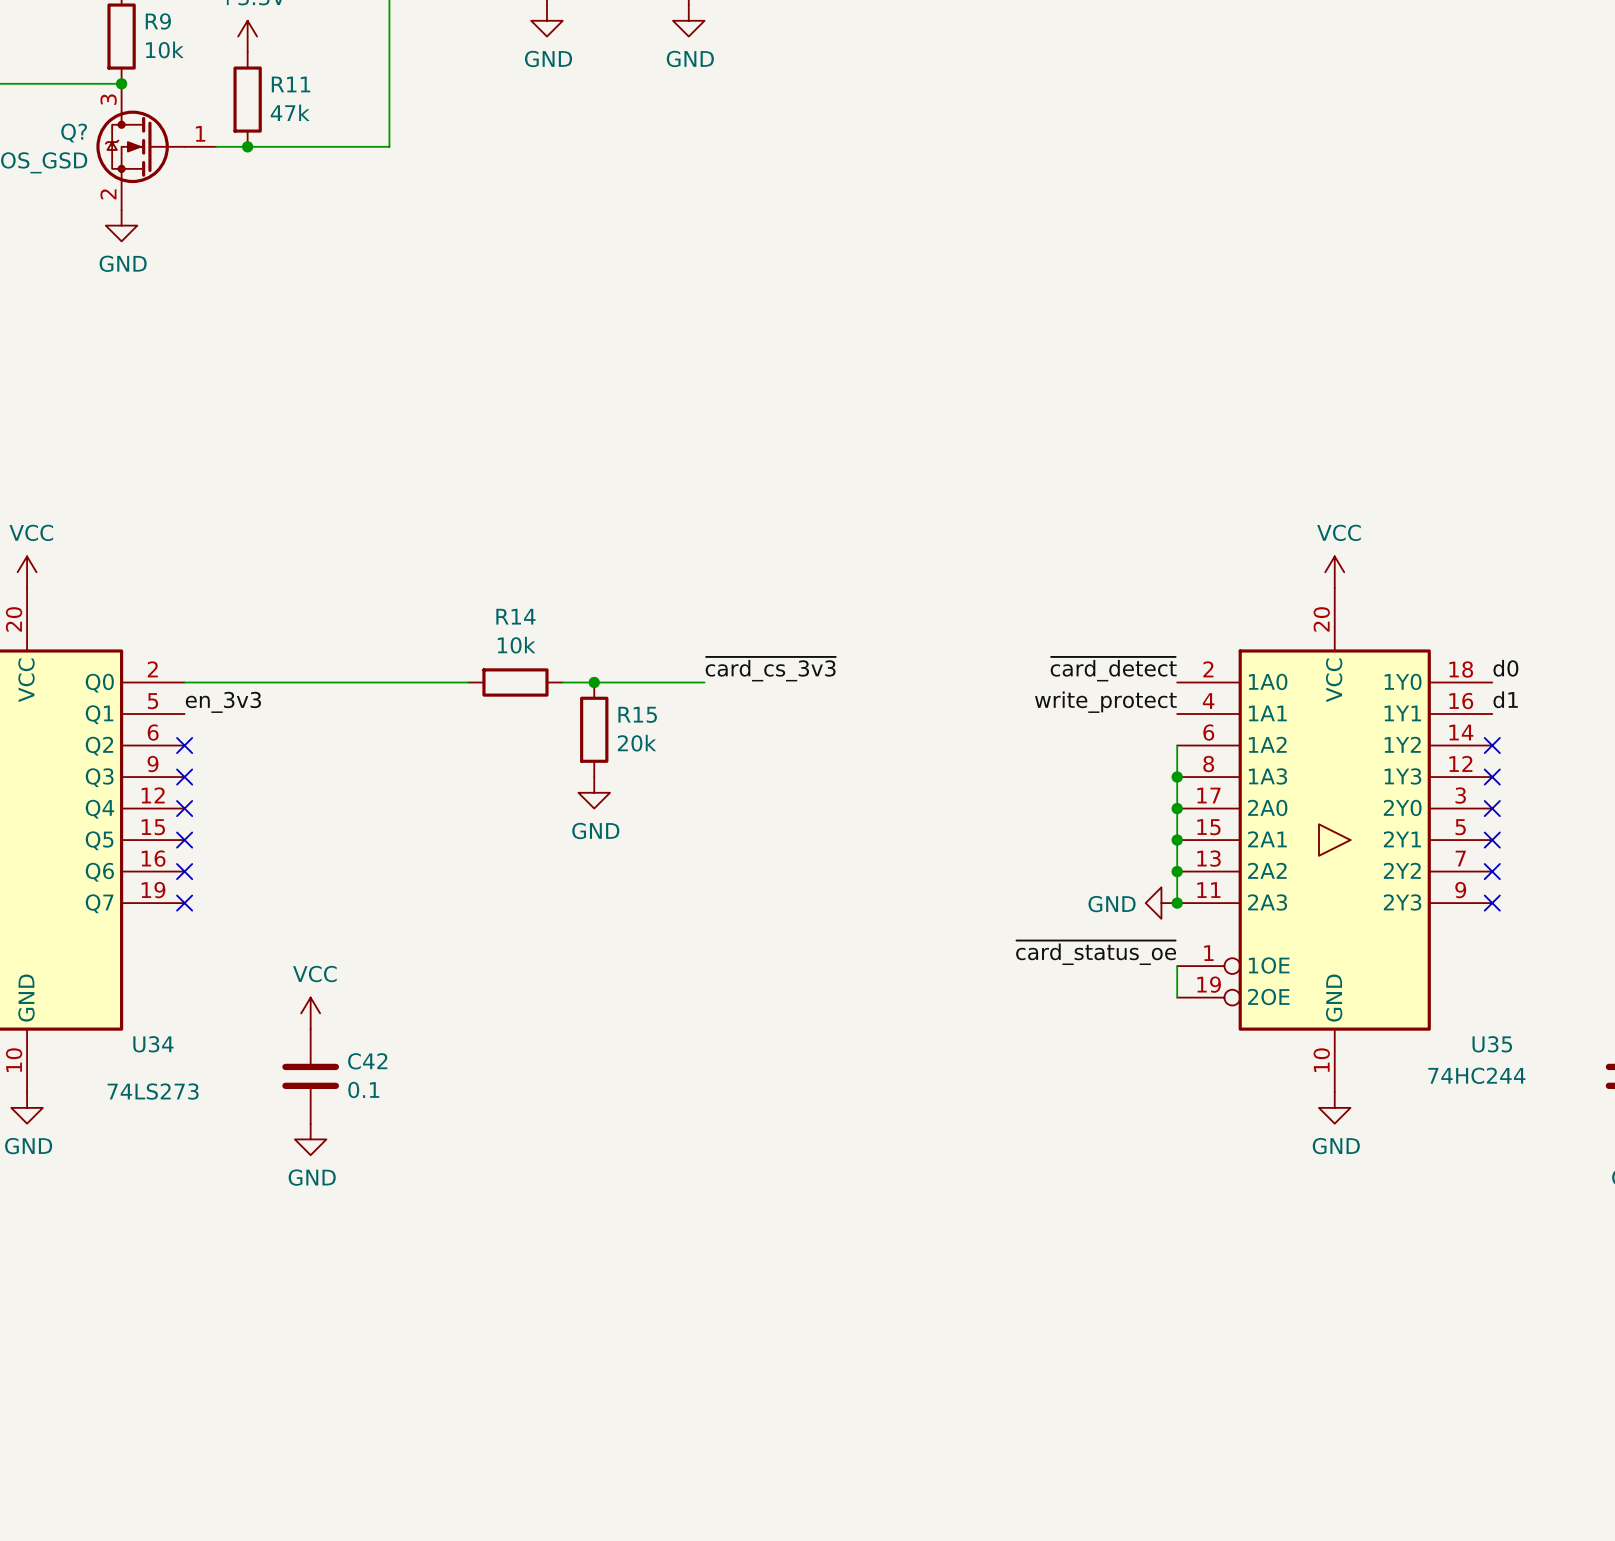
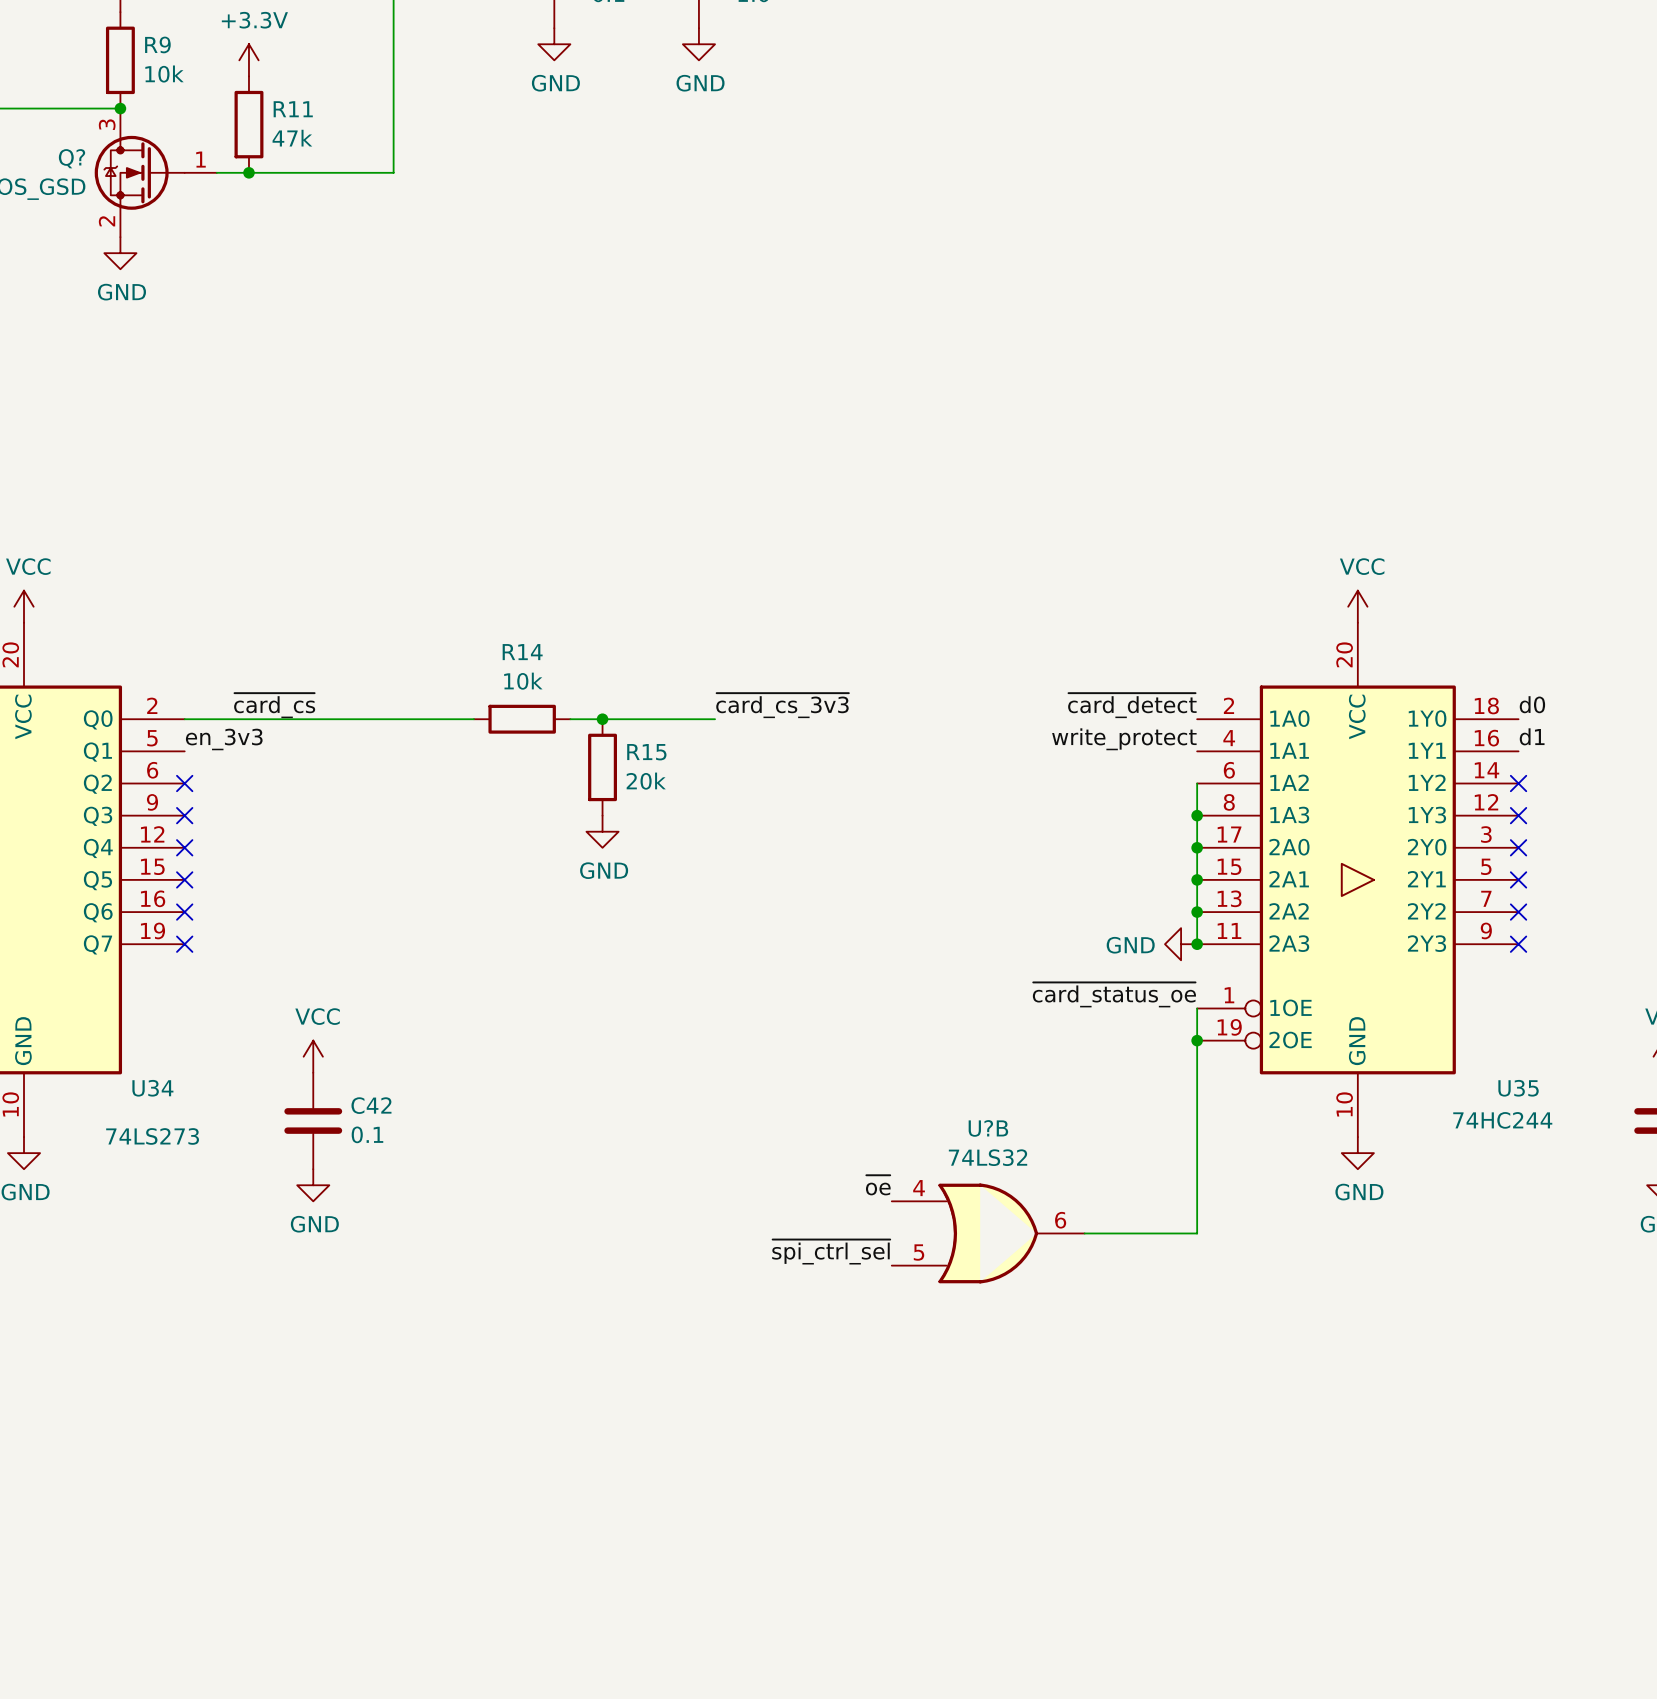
label: none -> ~{card_cs} (274, 705)
wire: none -> (1197, 1040) (1197, 1233) (1084, 1233)
junction: none -> (1197, 1040)
label: none -> ~{oe} (878, 1185)
U?B: none -> 74LS32 (988, 1233)
label: none -> ~{spi_ctrl_sel} (831, 1252)

